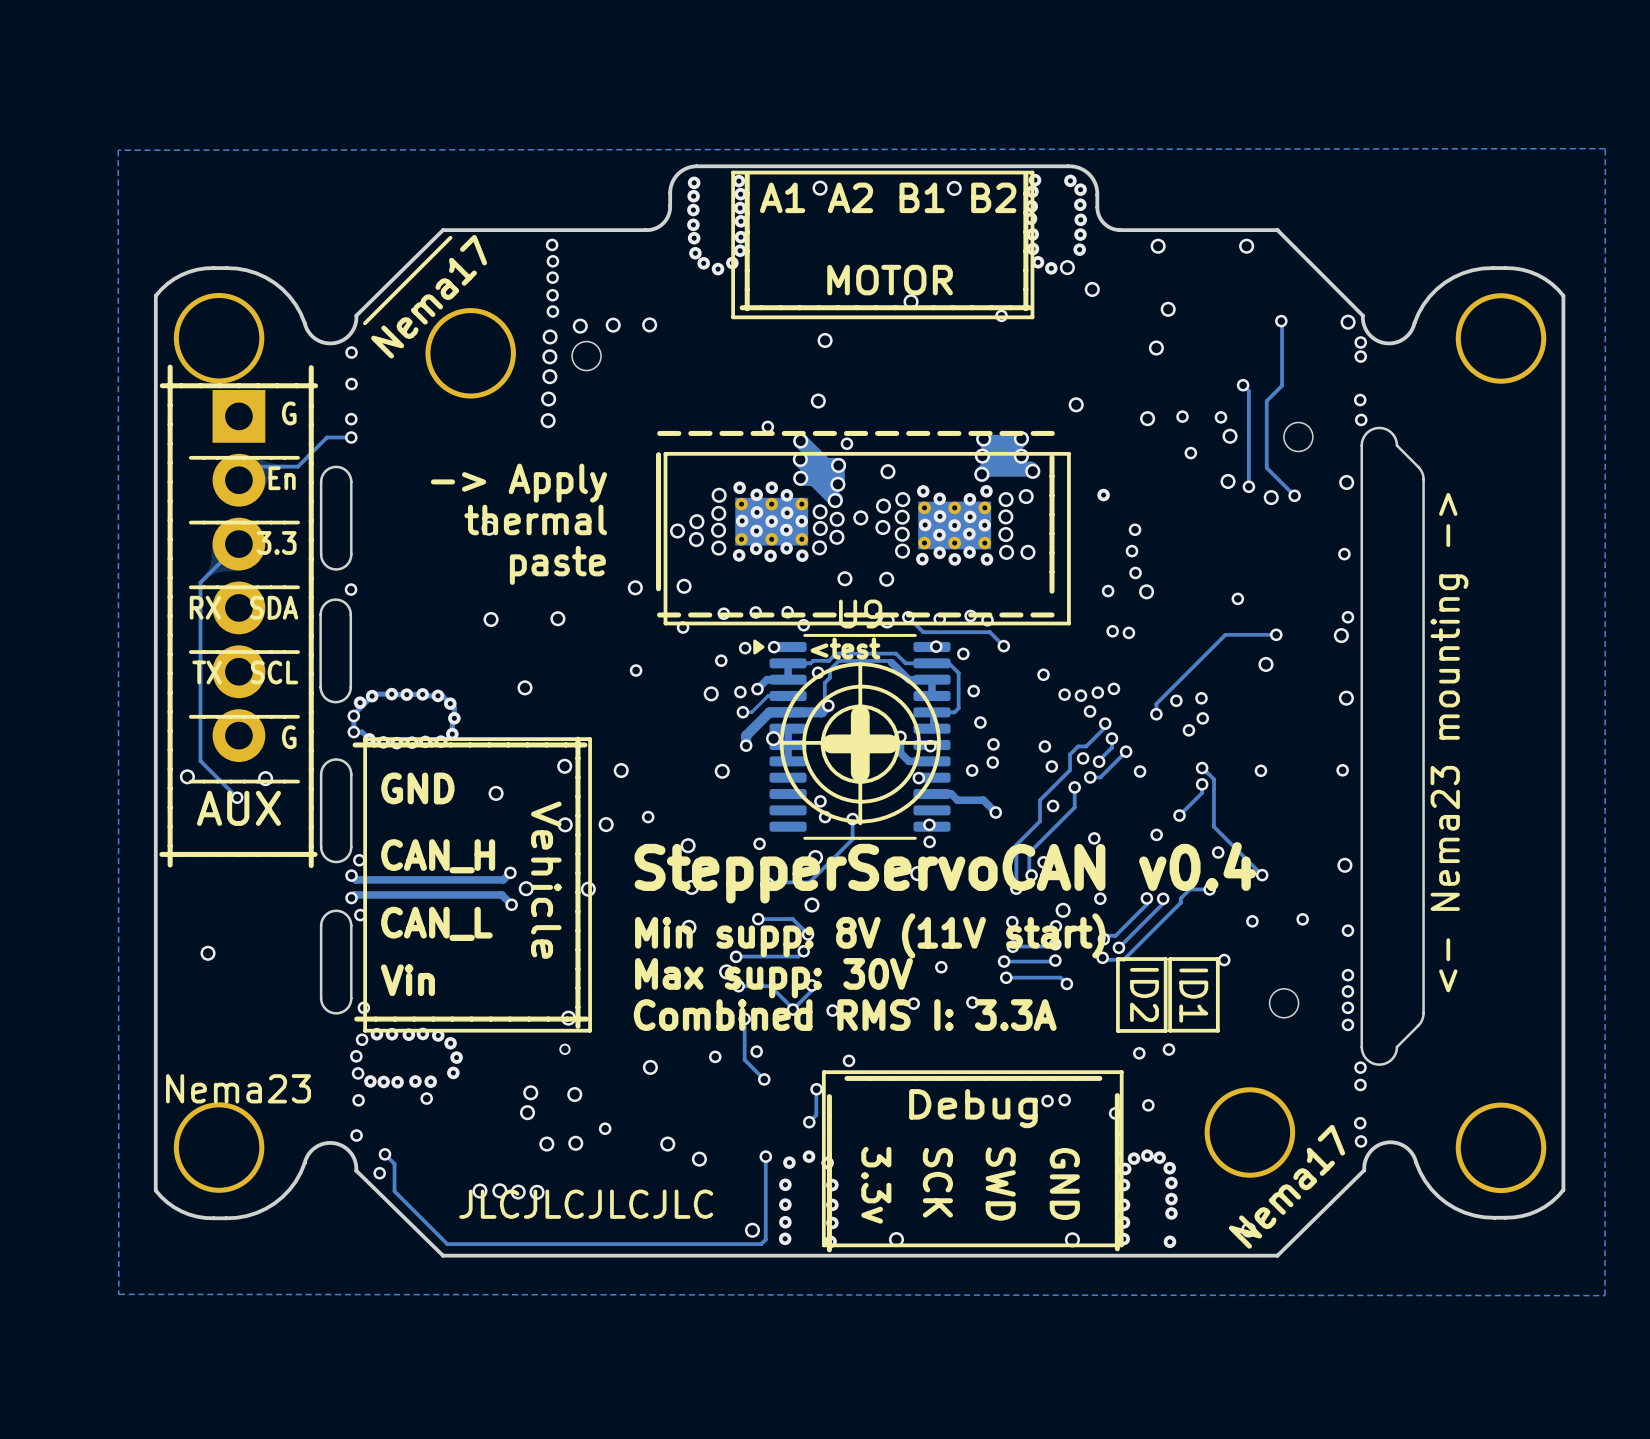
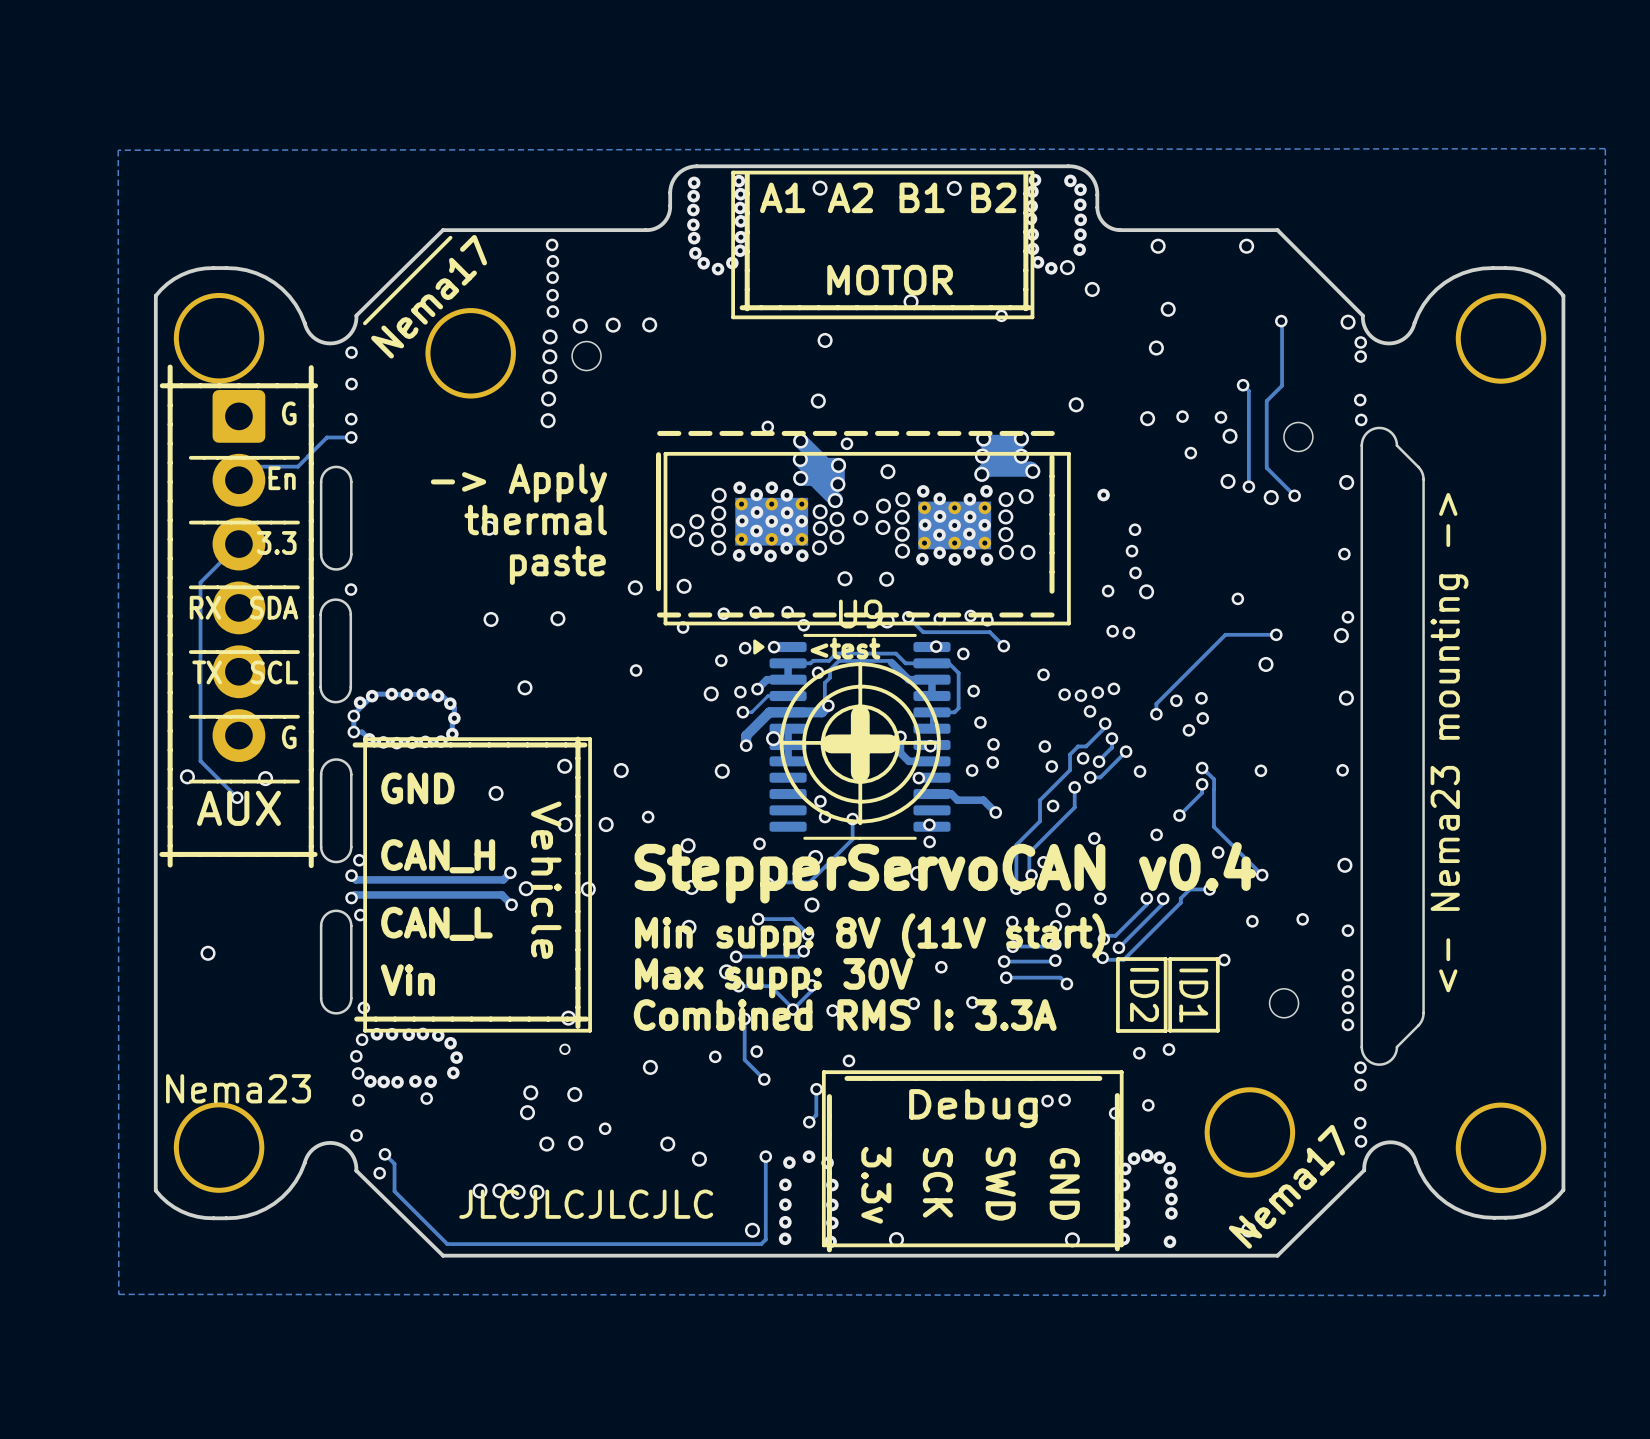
part footprint: [212, 389, 266, 763] -> [212, 389, 266, 763]

